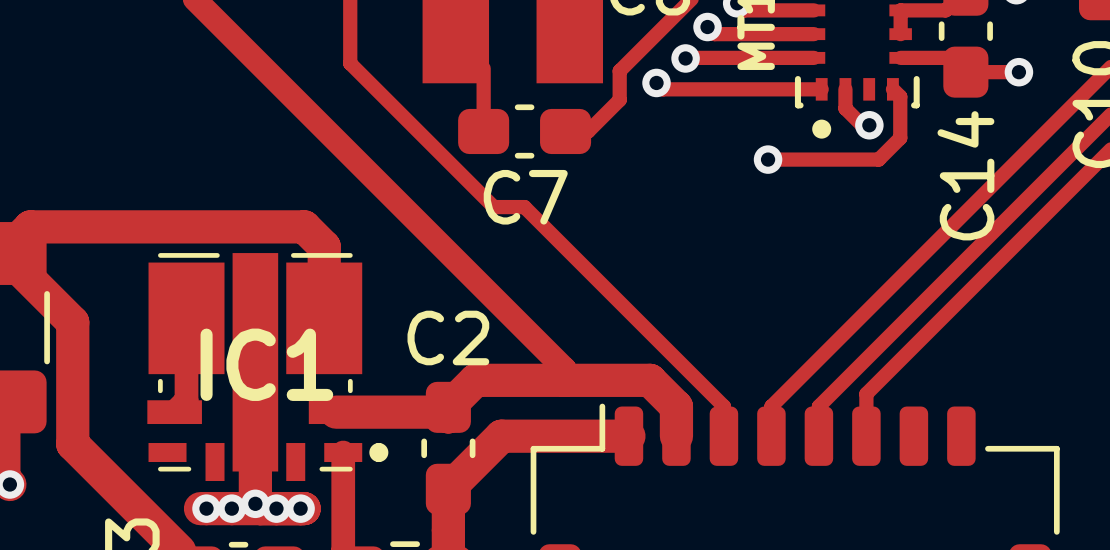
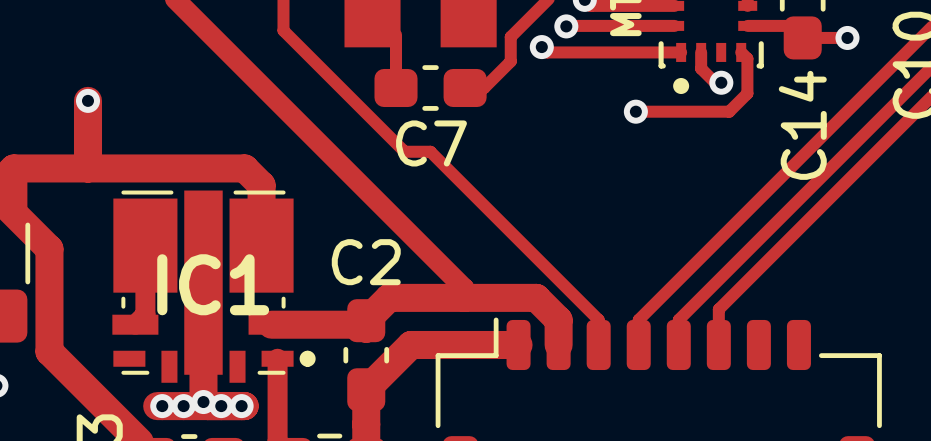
track: none -> (87, 100) (87, 168)
via: none -> (87, 100)

